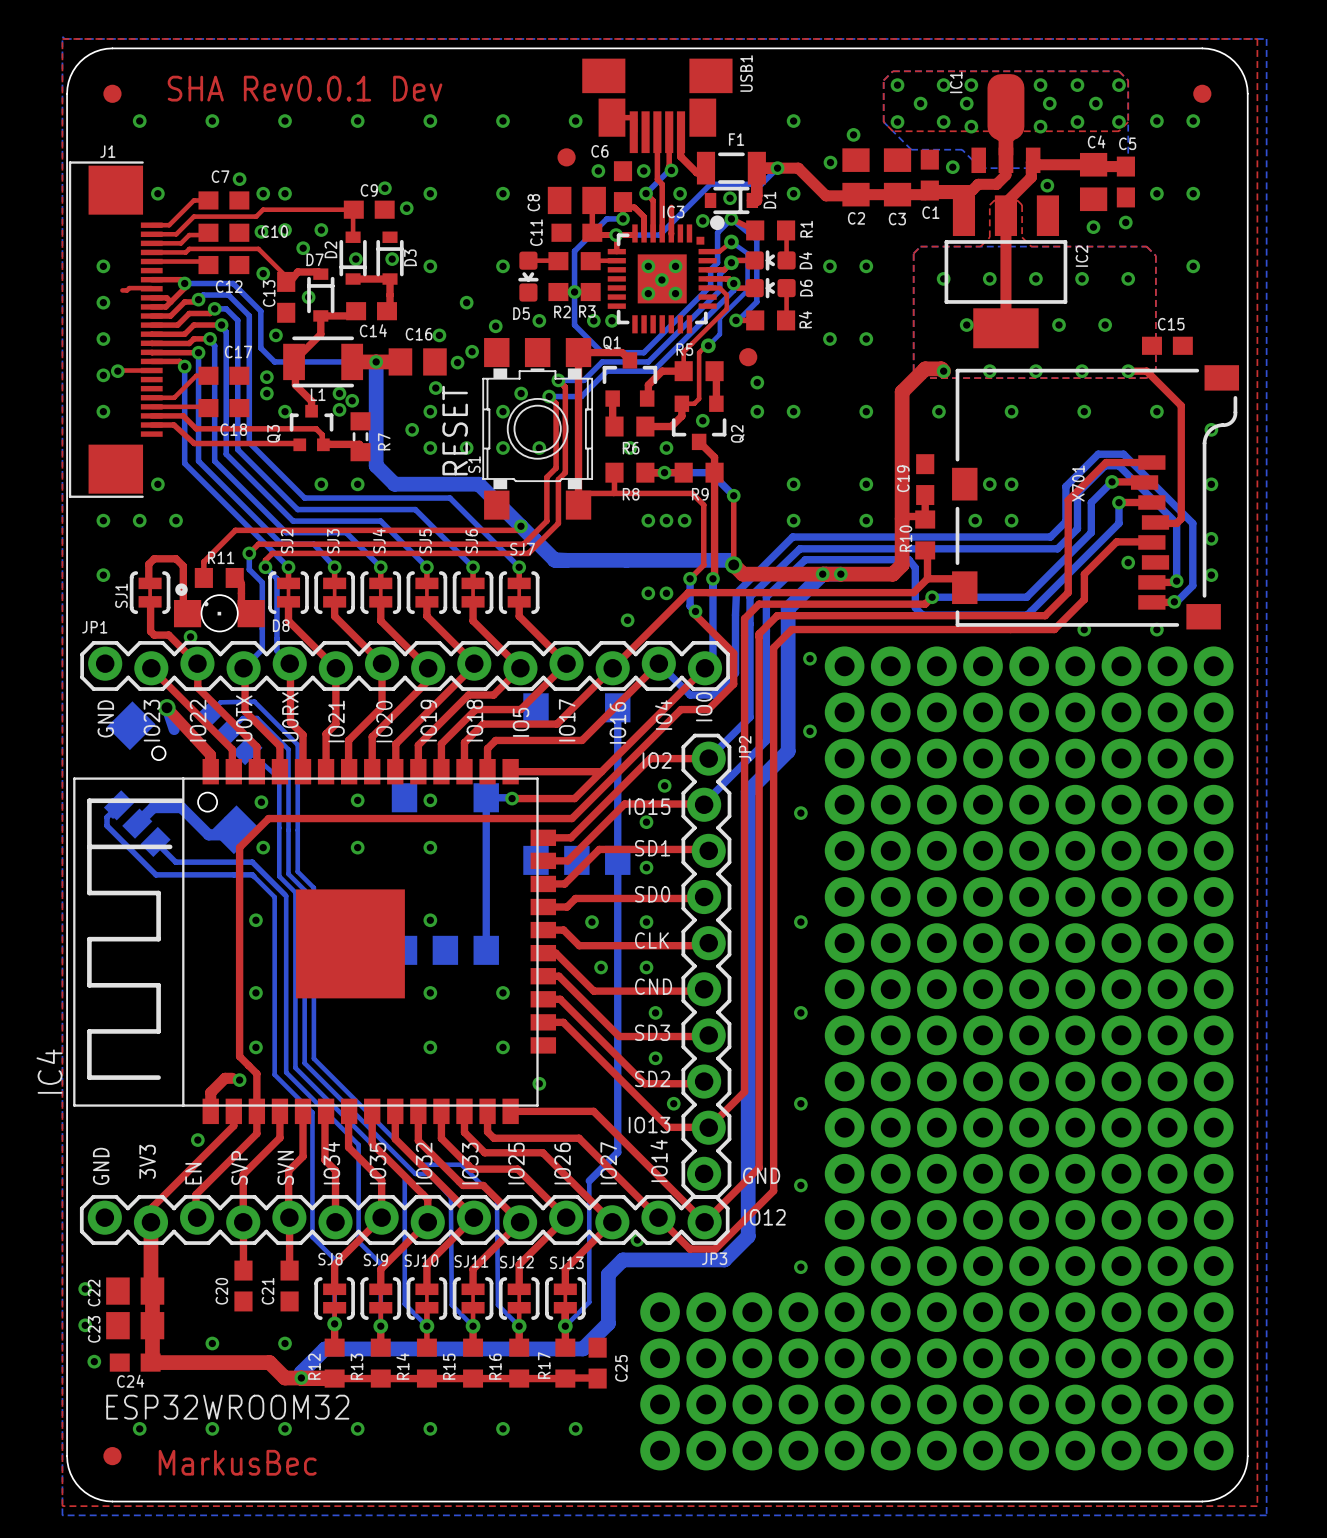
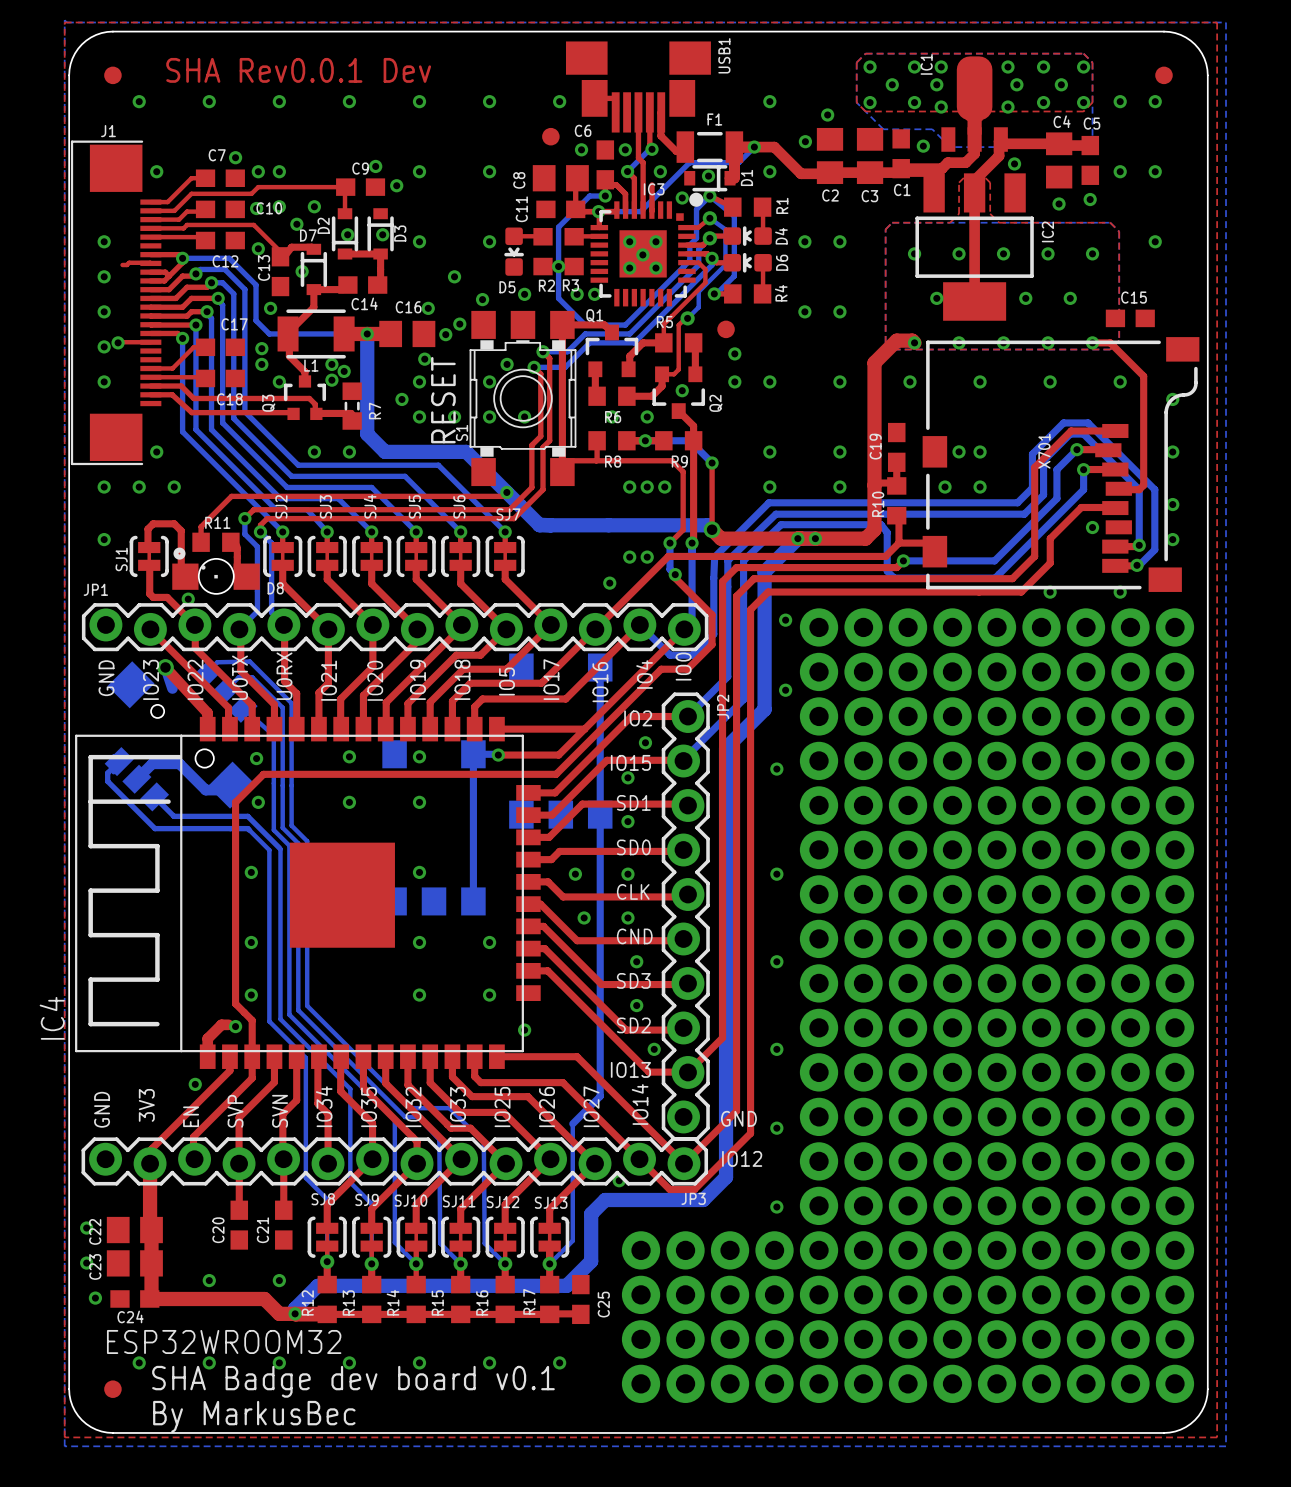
text: none -> SHA Badge dev board v0.1 (353, 1381)
text: MarkusBec (237, 1462) -> By MarkusBec (254, 1416)

